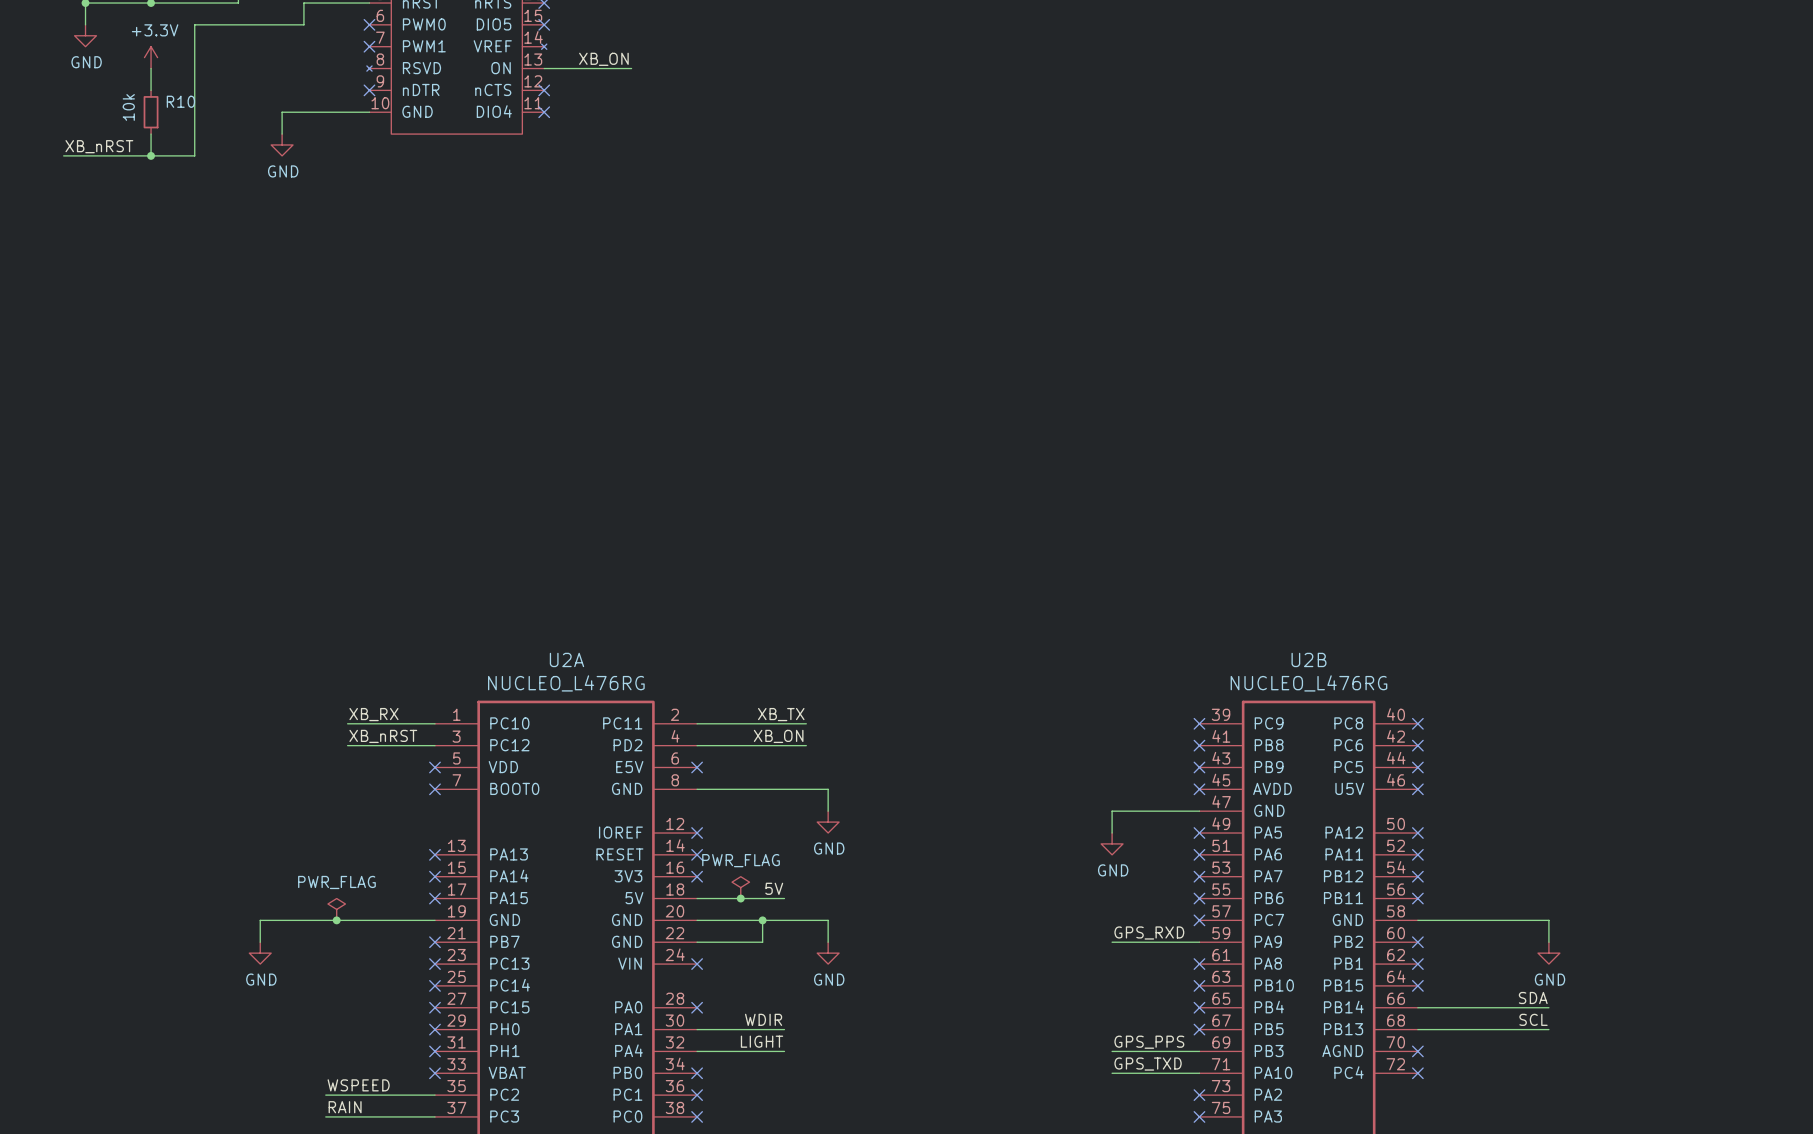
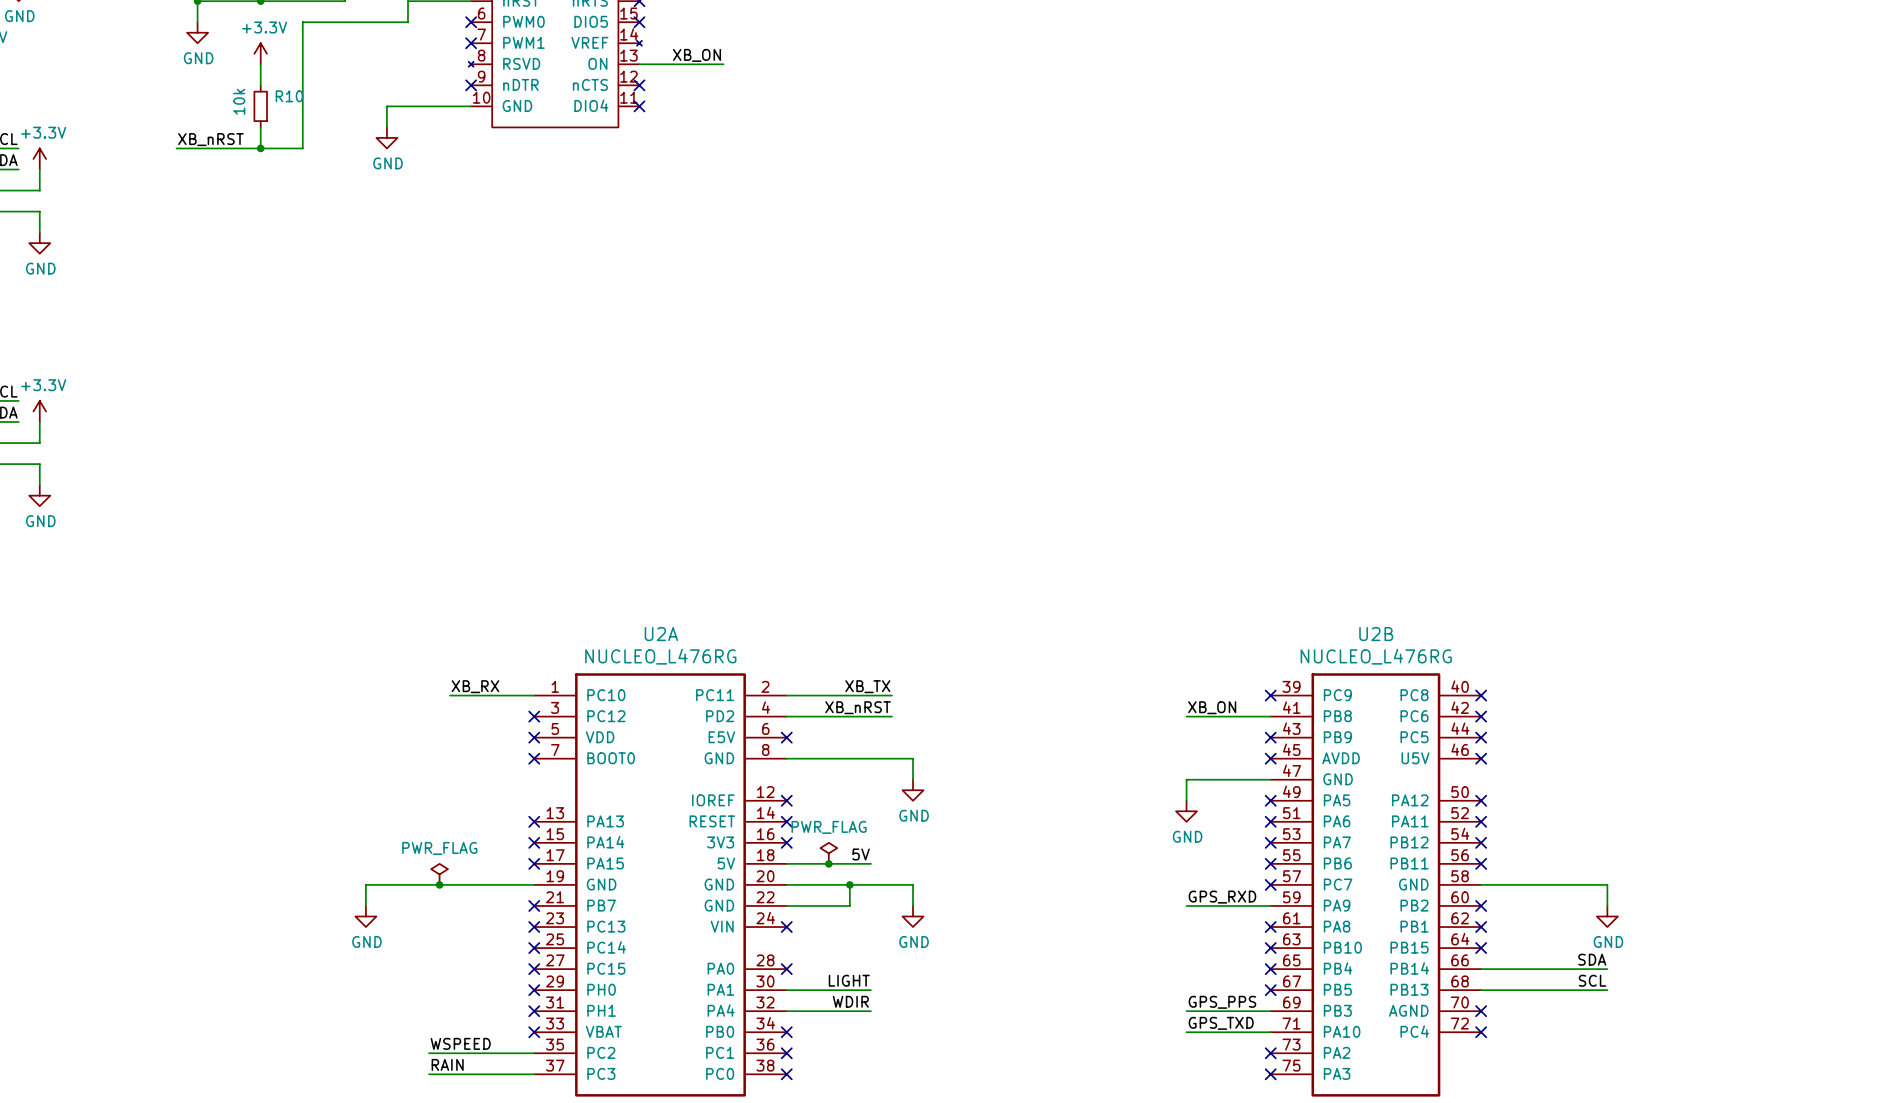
label: XB_nRST (383, 736) -> none
label: XB_ON (778, 736) -> XB_nRST (858, 707)
label: none -> XB_ON (1212, 707)
wire: (347, 745) (434, 745) -> none
no-connect mark: none -> (534, 716)
wire: none -> (1186, 716) (1270, 716)
no-connect mark: (1199, 745) -> none
label: WDIR (763, 1019) -> LIGHT (849, 980)
label: LIGHT (762, 1041) -> WDIR (850, 1001)

